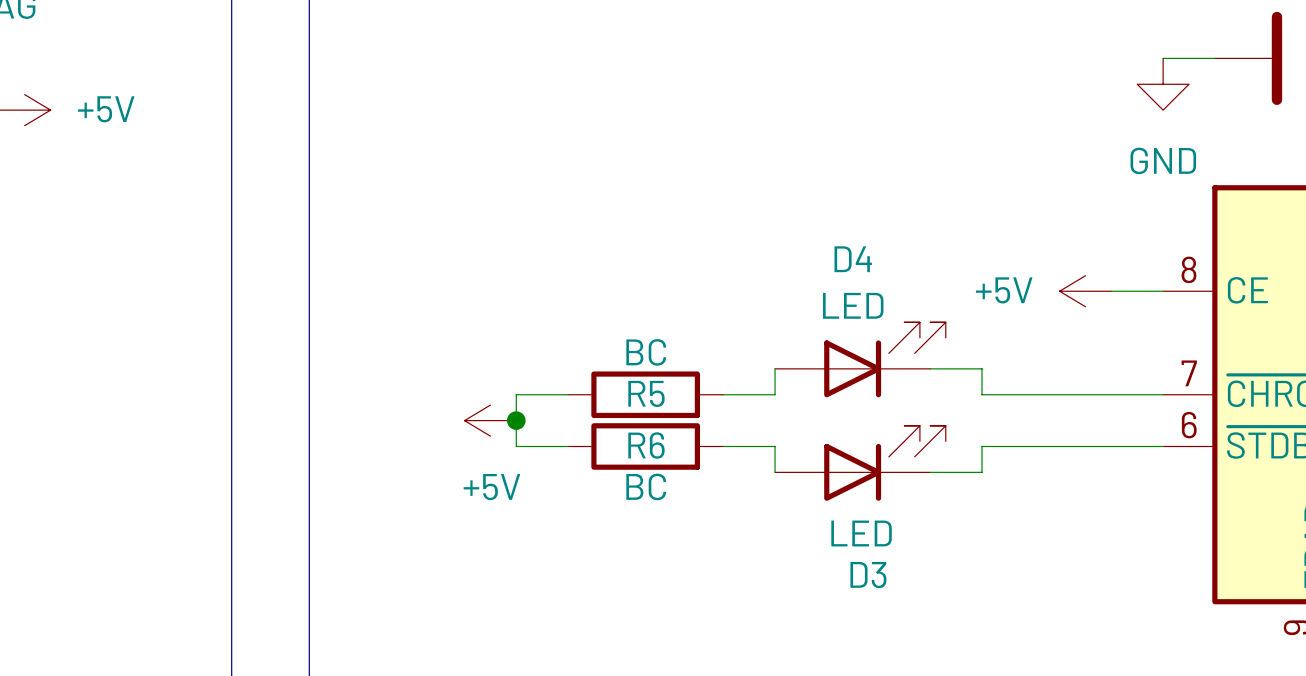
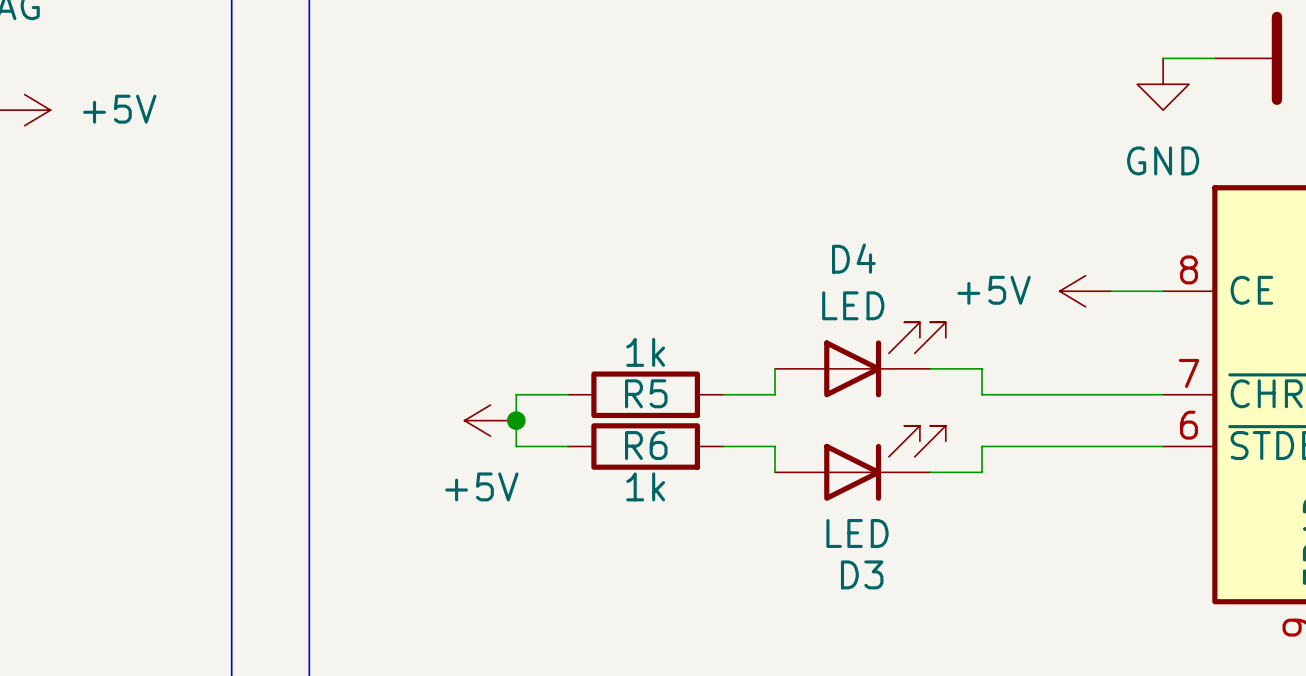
R5 value: BC (646, 352) -> 1k (645, 352)
R6 value: BC (646, 486) -> 1k (645, 486)

